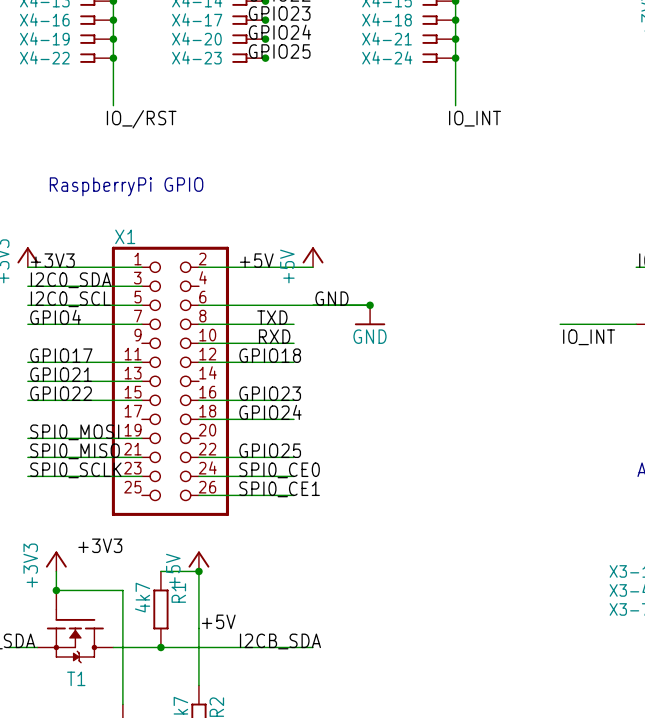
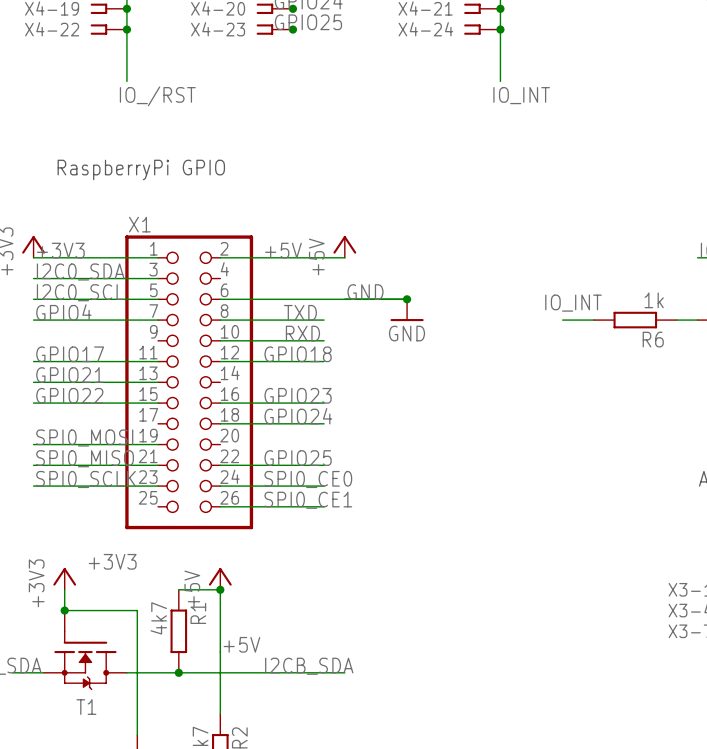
wire: none -> (562, 320) (593, 320)
wire: (560, 324) (617, 324) -> none
R6: none -> 1k (635, 320)
label position: IO_INT (589, 337) -> IO_INT (573, 303)

